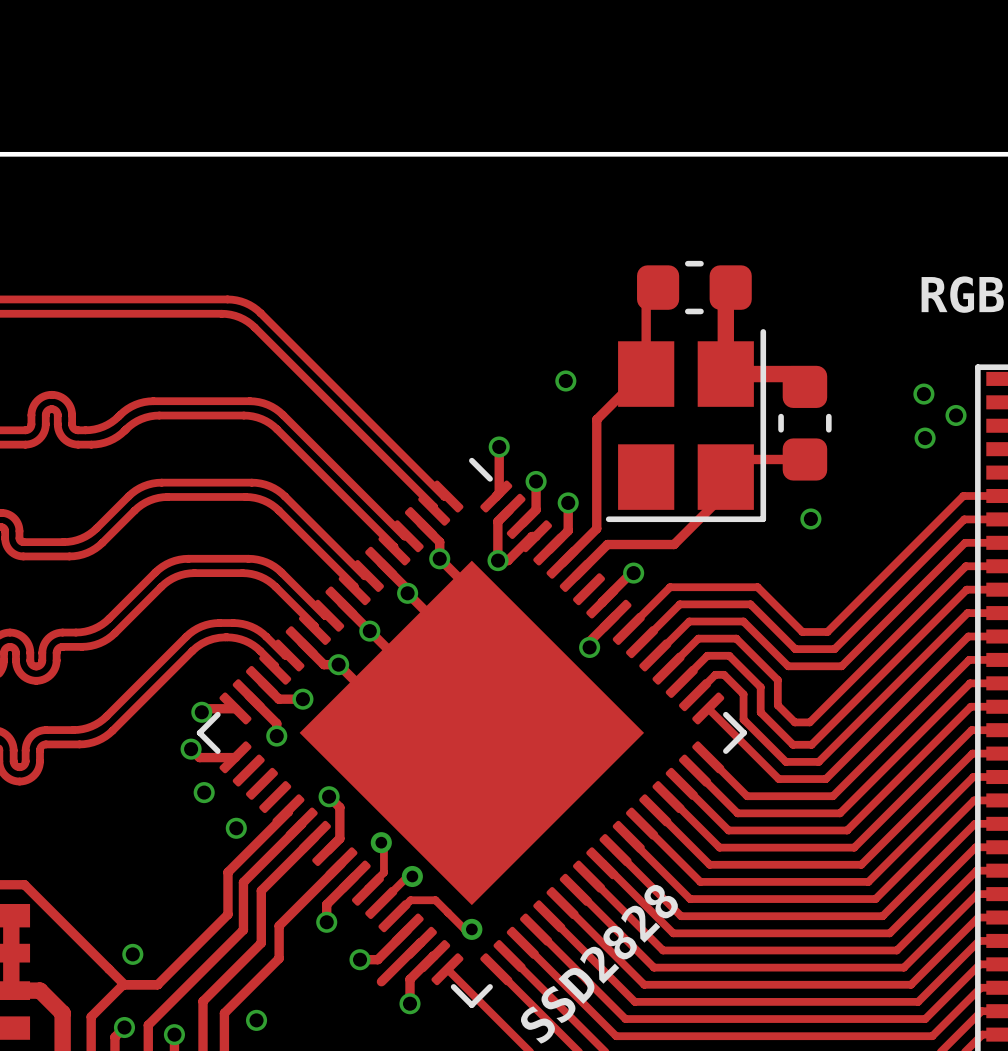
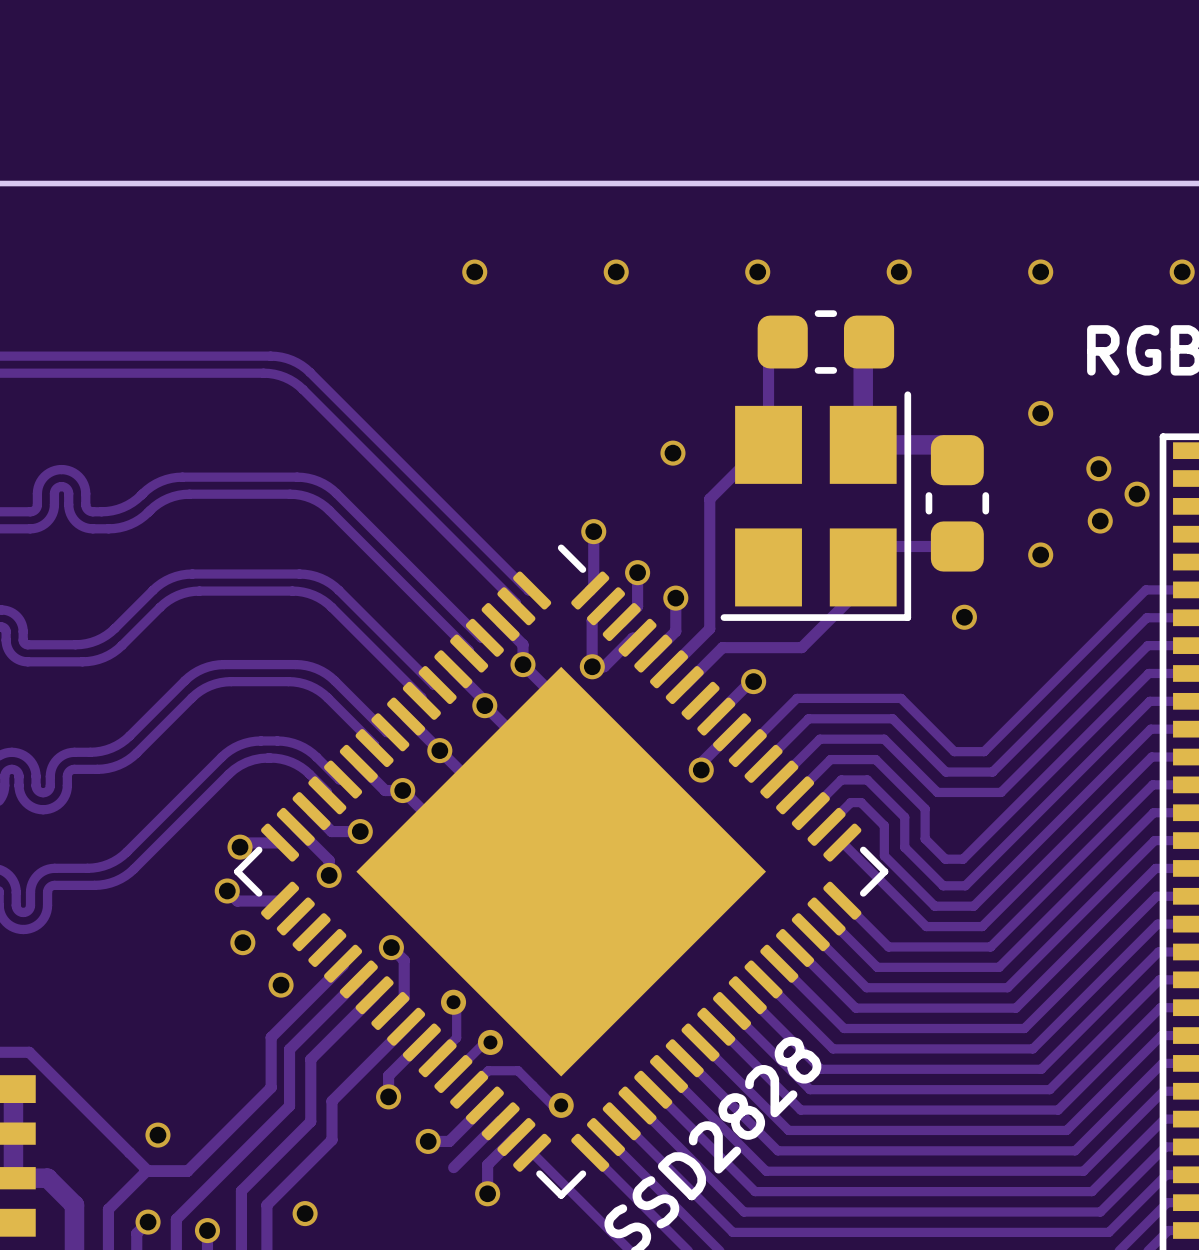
via: none -> (474, 272)
via: none -> (616, 272)
via: none -> (757, 272)
via: none -> (899, 272)
via: none -> (1040, 272)
via: none -> (1182, 272)
via: none -> (1040, 413)
via: none -> (1040, 554)

